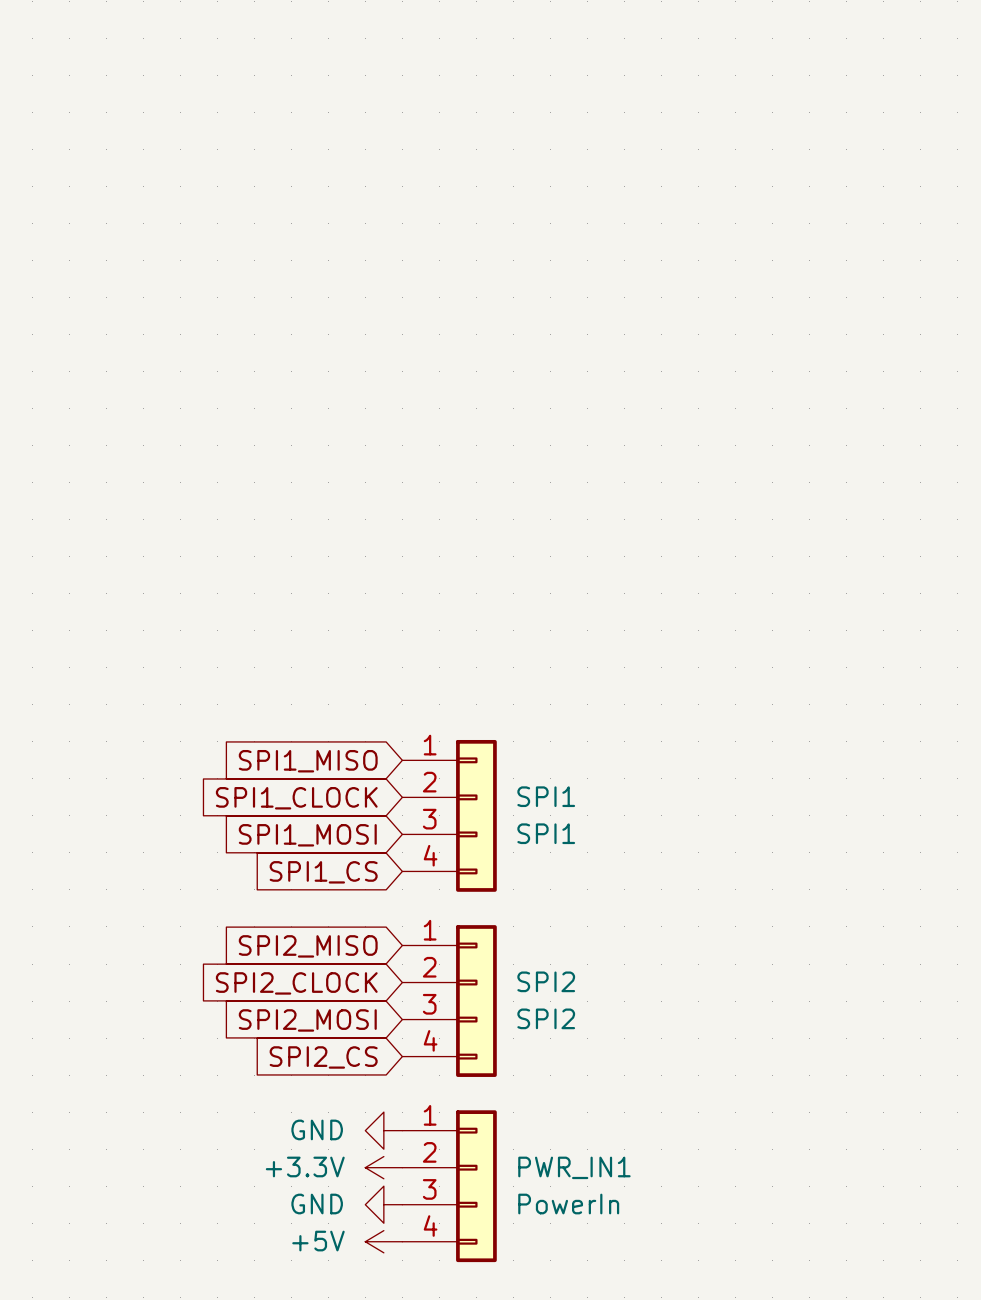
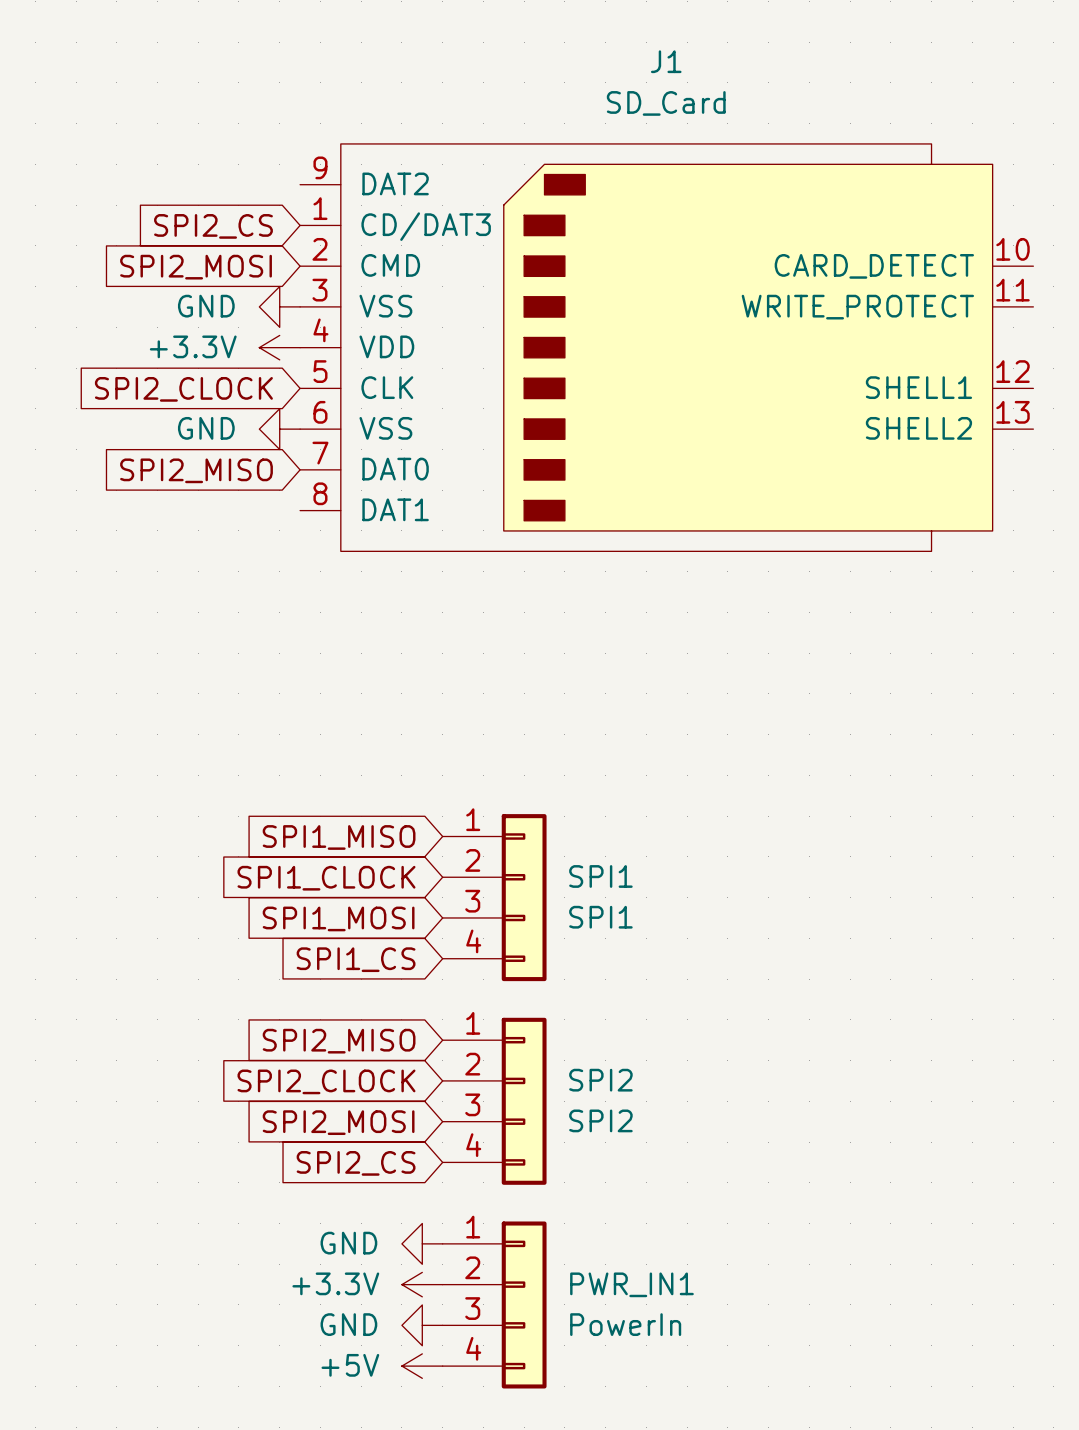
global label: none -> SPI2_CS (213, 226)
global label: none -> SPI2_MOSI (196, 267)
power symbol: none -> GND (279, 306)
power symbol: none -> +3.3V (279, 347)
J1: none -> SD_Card (666, 347)
global label: none -> SPI2_CLOCK (183, 389)
power symbol: none -> GND (279, 429)
global label: none -> SPI2_MISO (196, 470)

